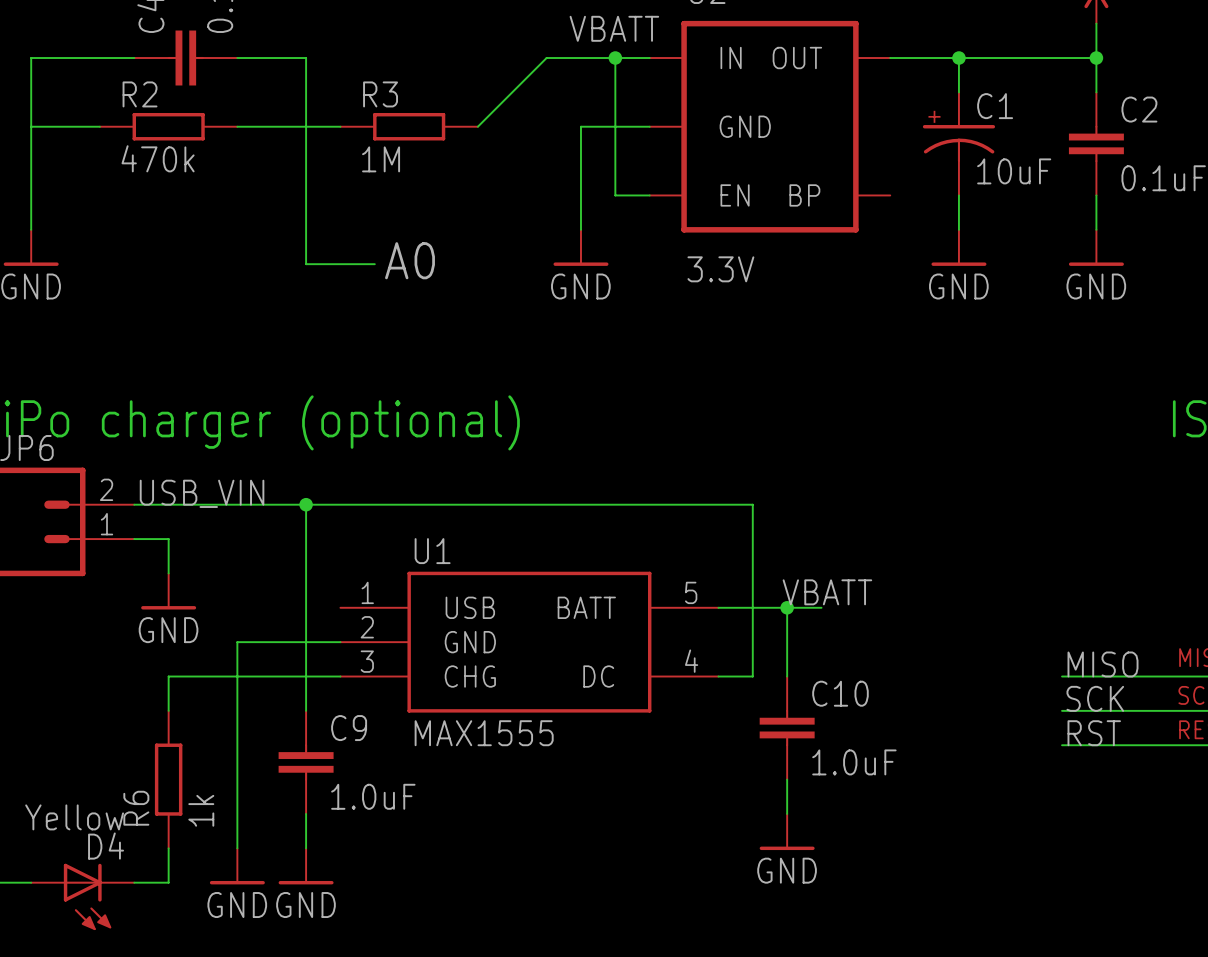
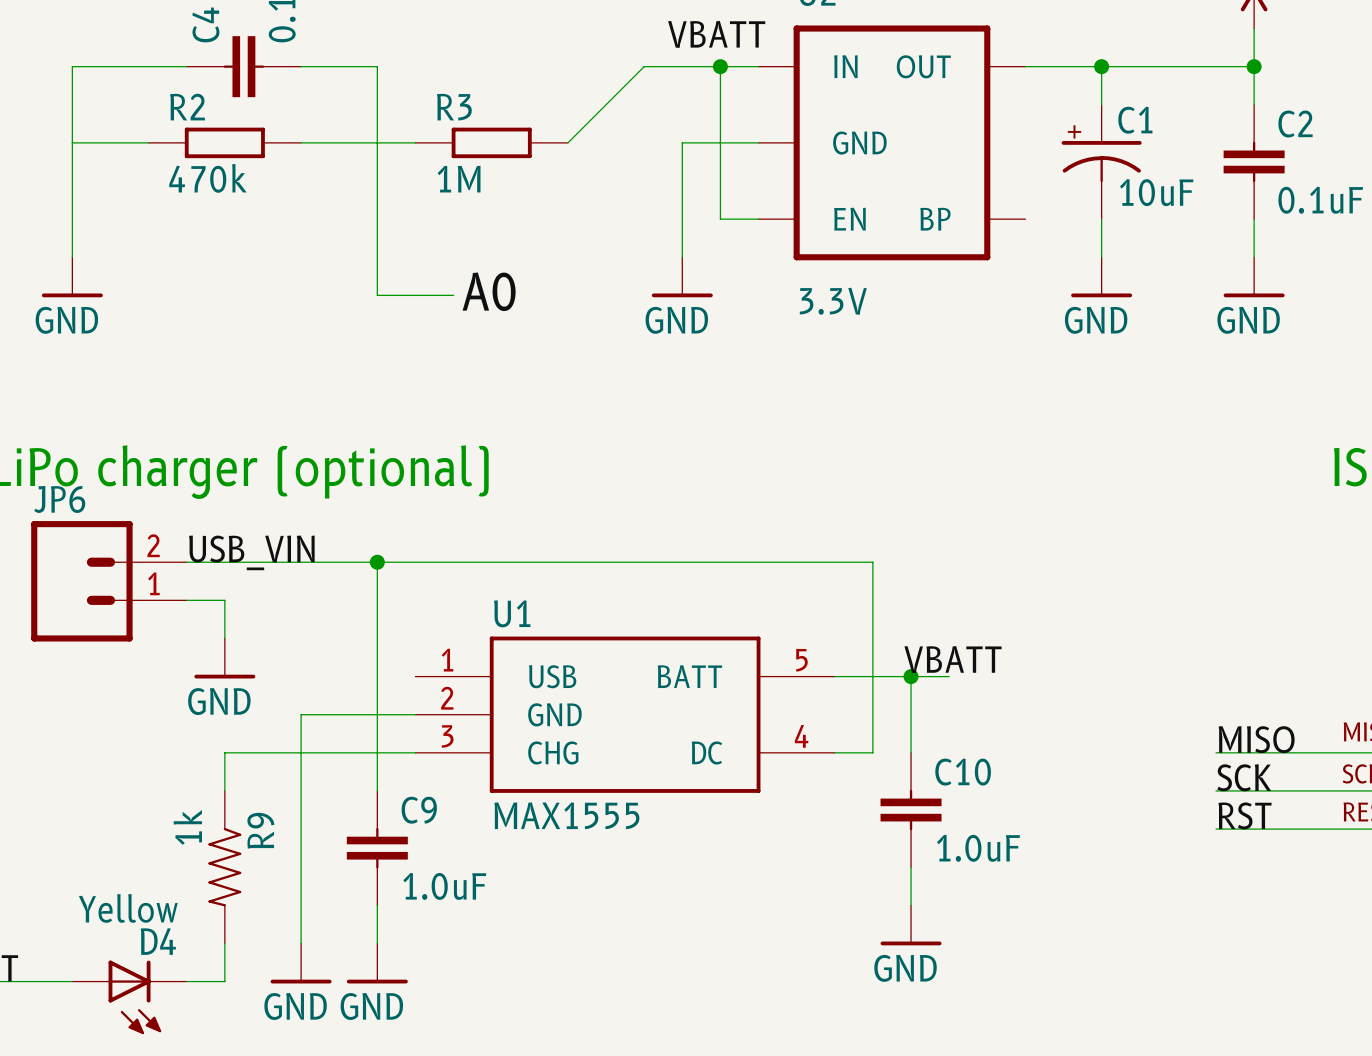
R6: 1k (168, 779) -> none
R9: none -> 1k (224, 867)

